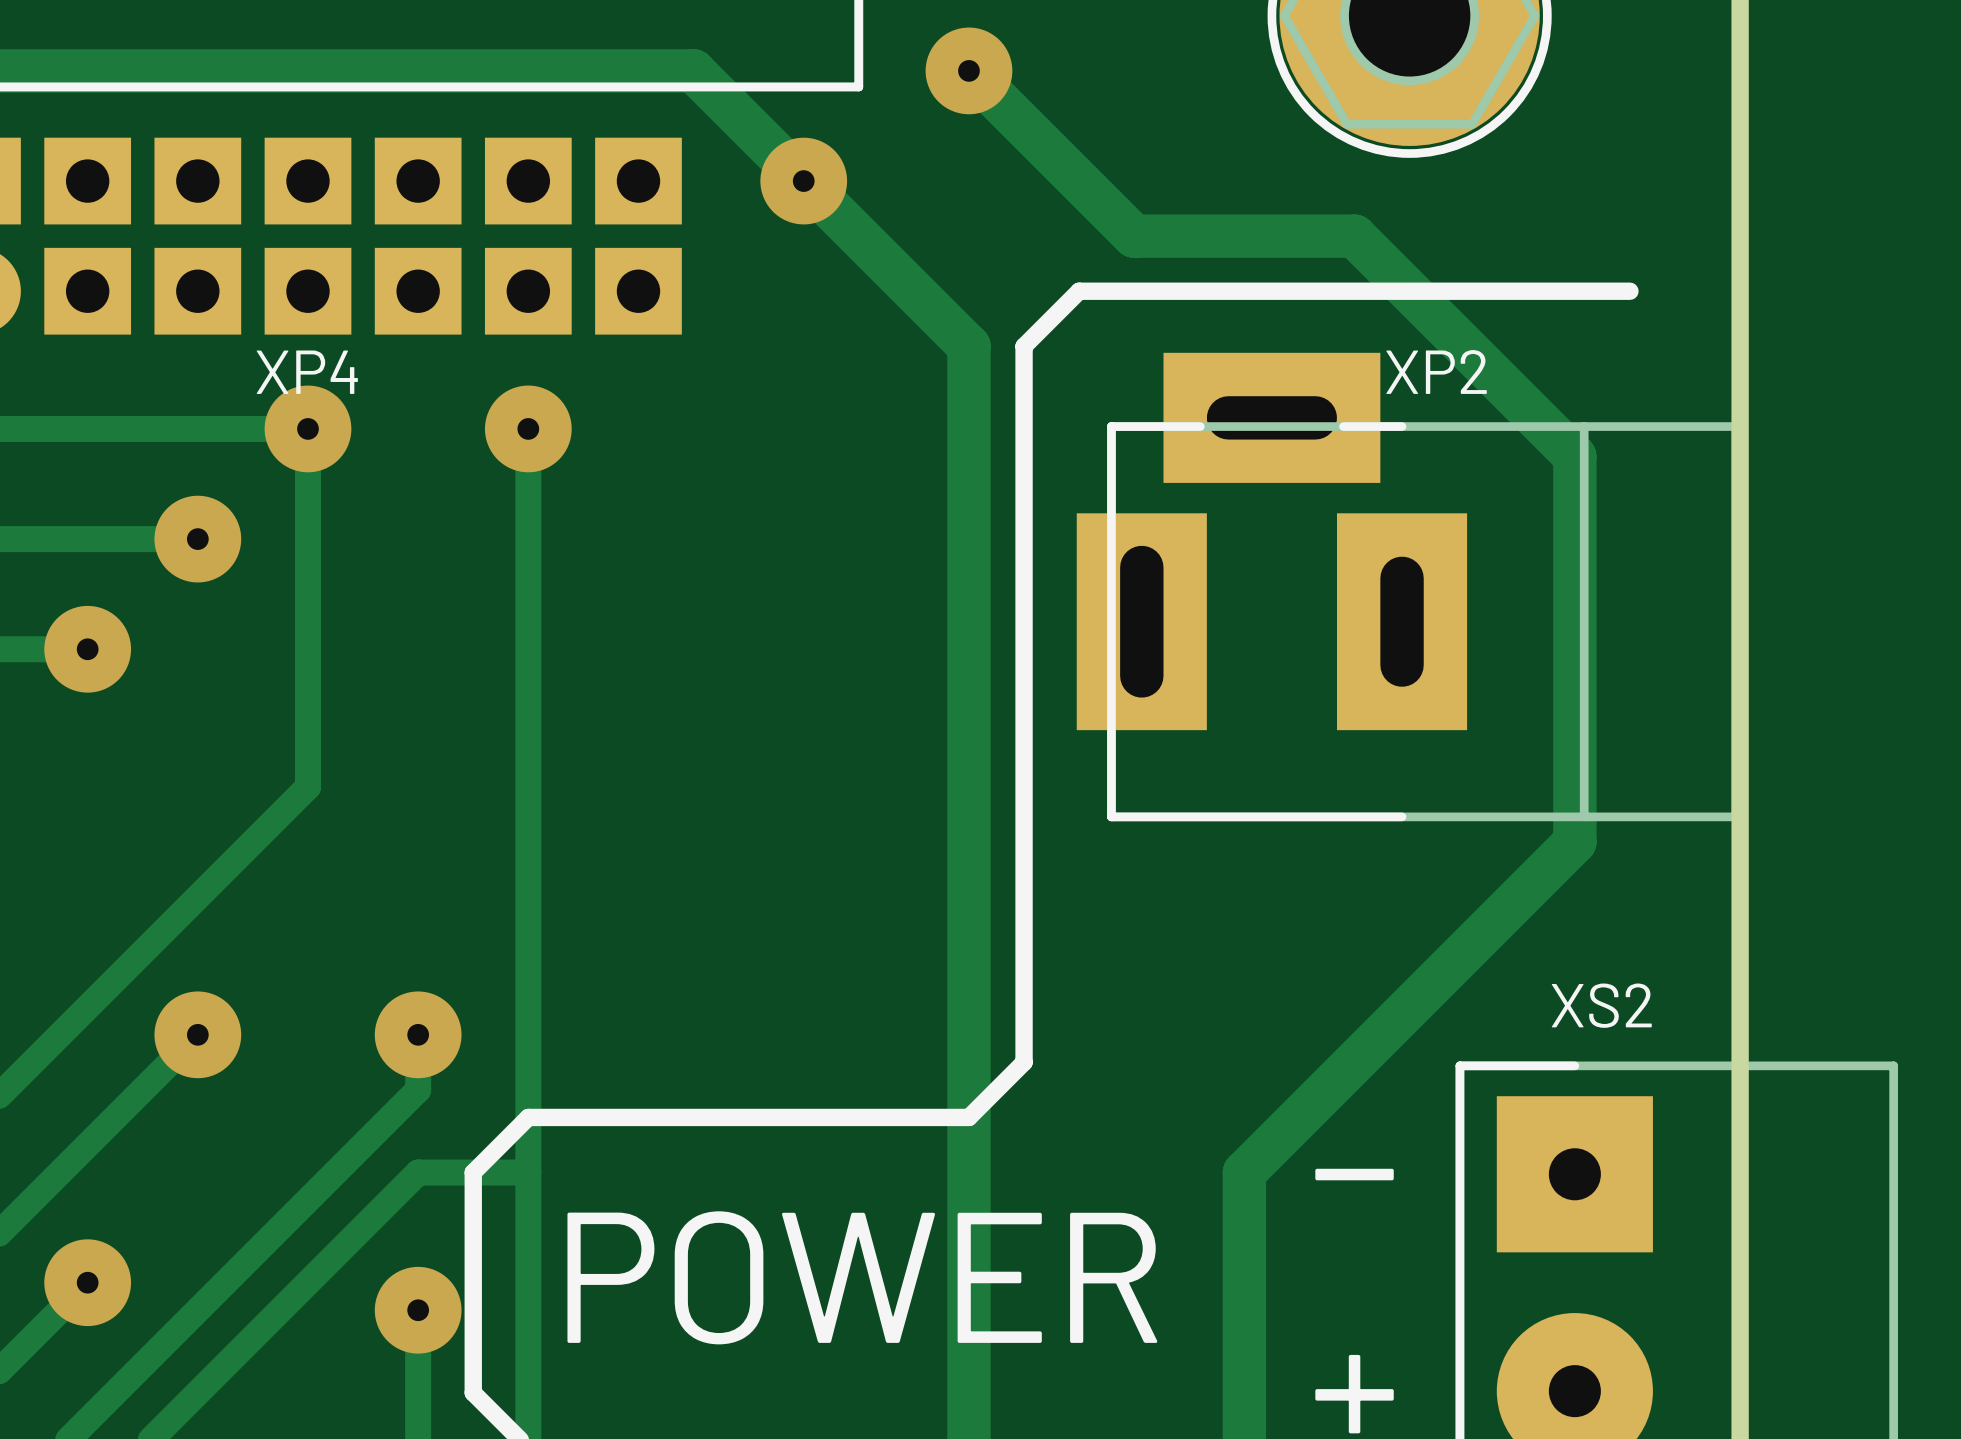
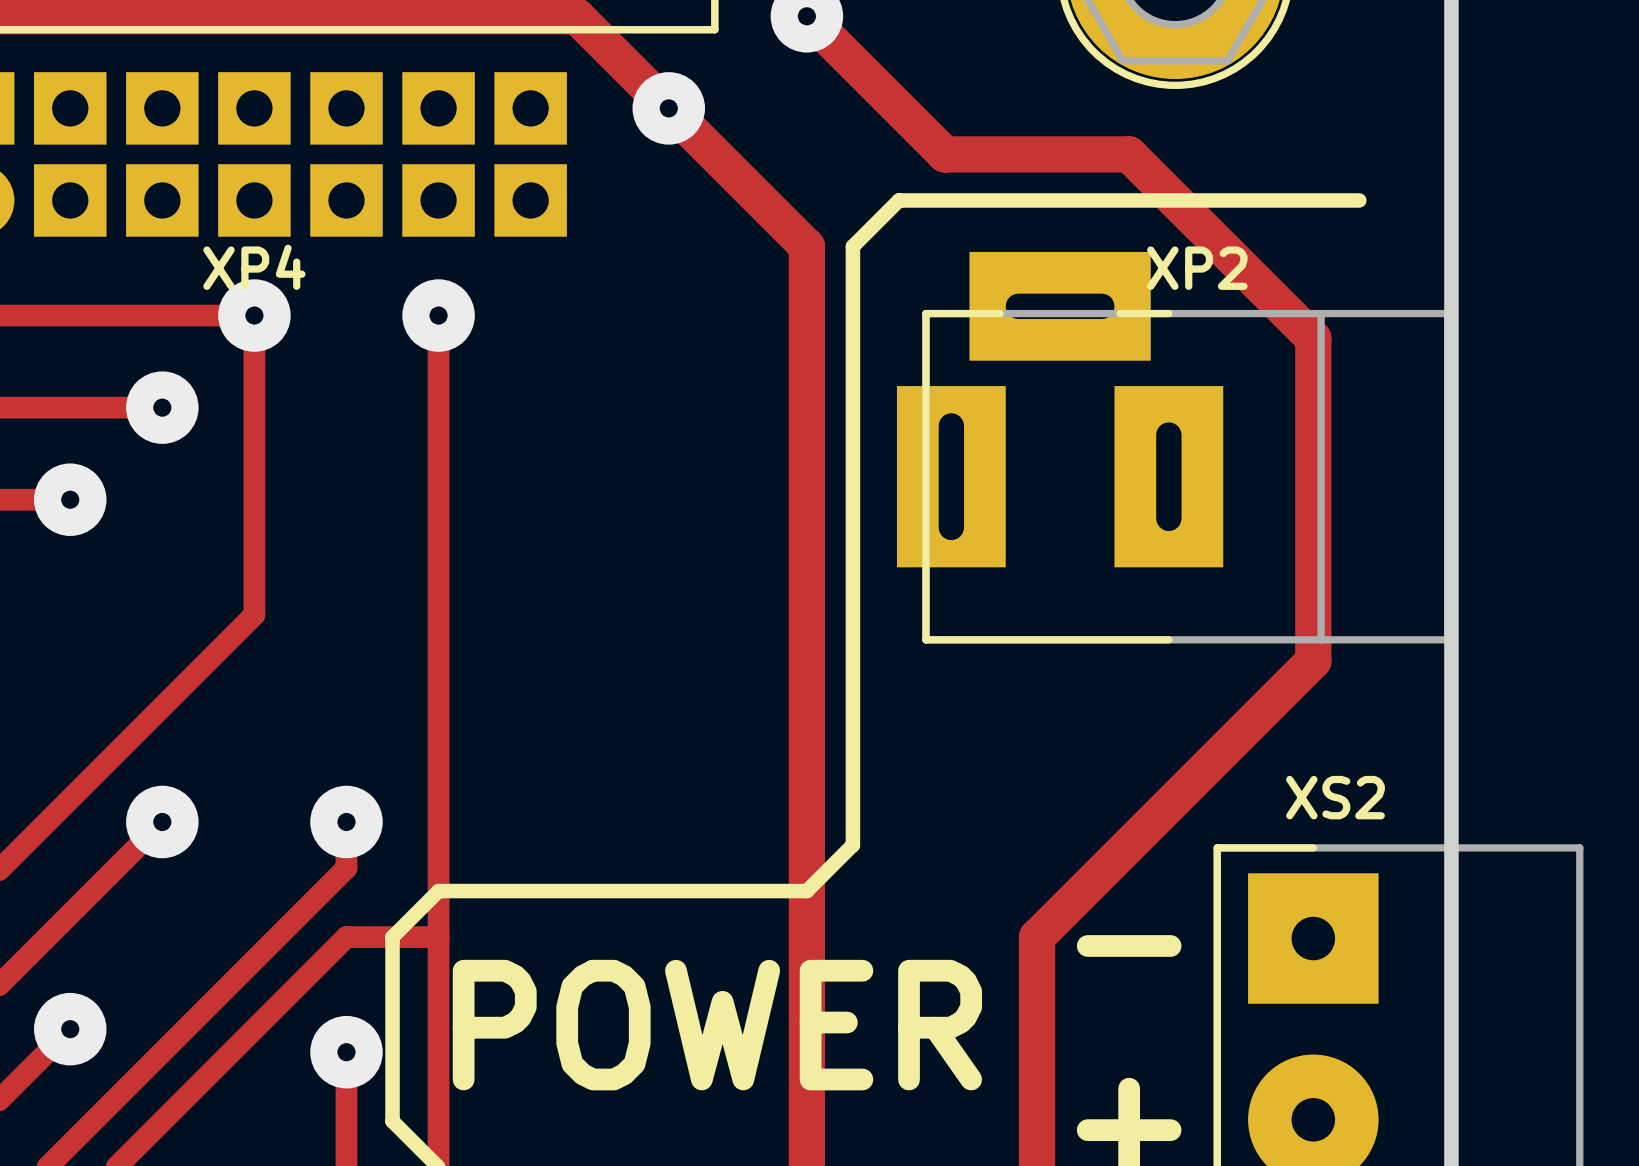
XP2 footprint: [1076, 352, 1741, 822] -> [896, 251, 1452, 644]

